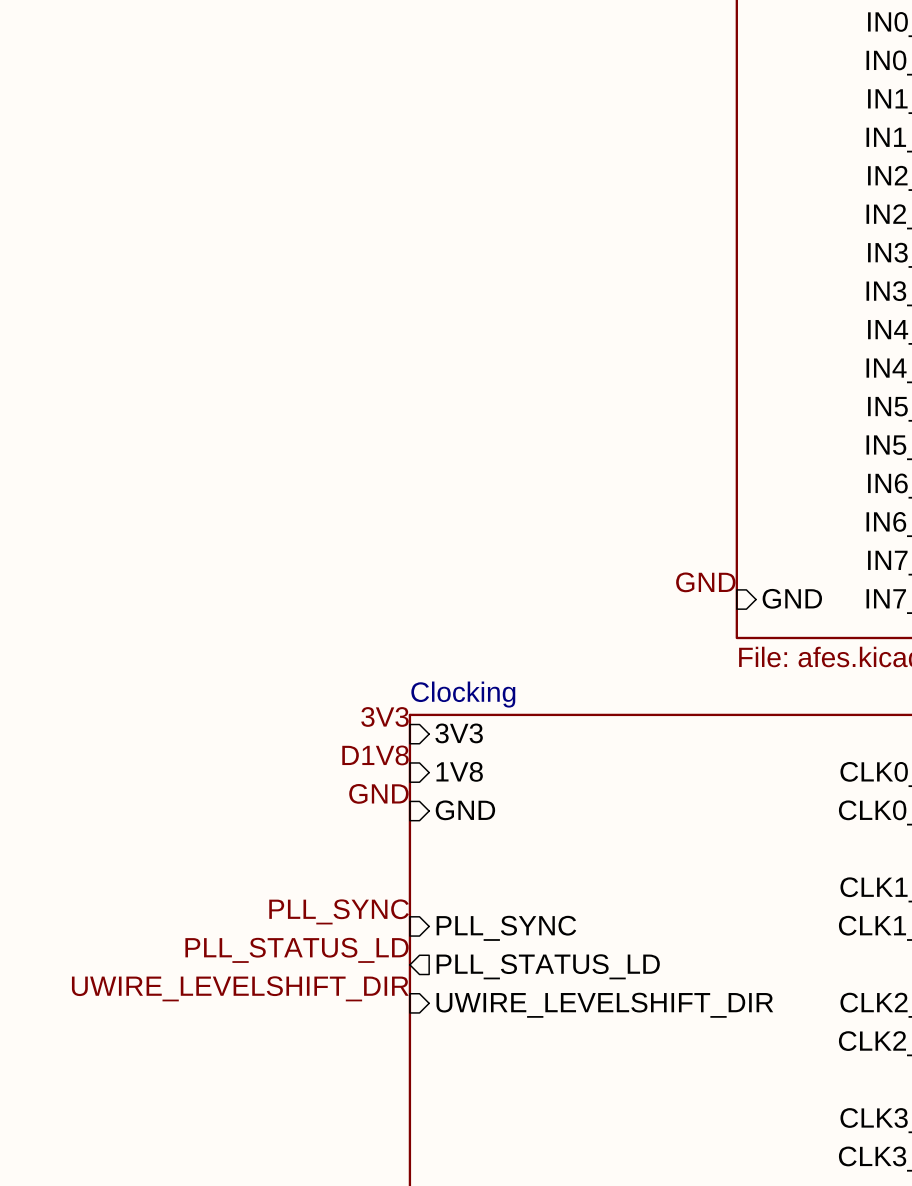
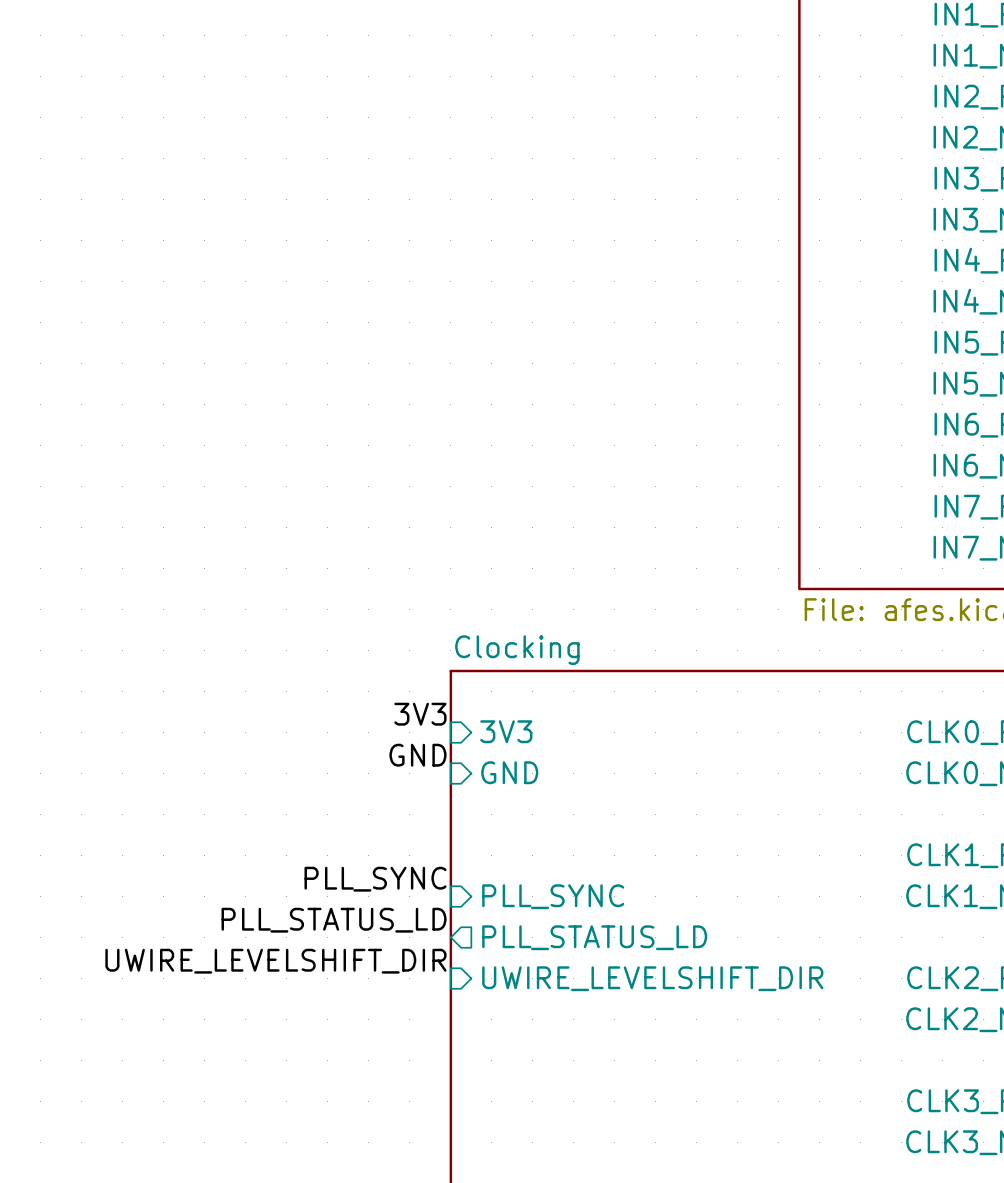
label: GND (705, 582) -> none
sheet pin: GND (792, 598) -> none
label: 3V3 (384, 716) -> none
sheet pin: 3V3 (459, 733) -> none
label: D1V8 (375, 755) -> 3V3 (420, 714)
sheet pin: 1V8 (459, 771) -> 3V3 (506, 731)

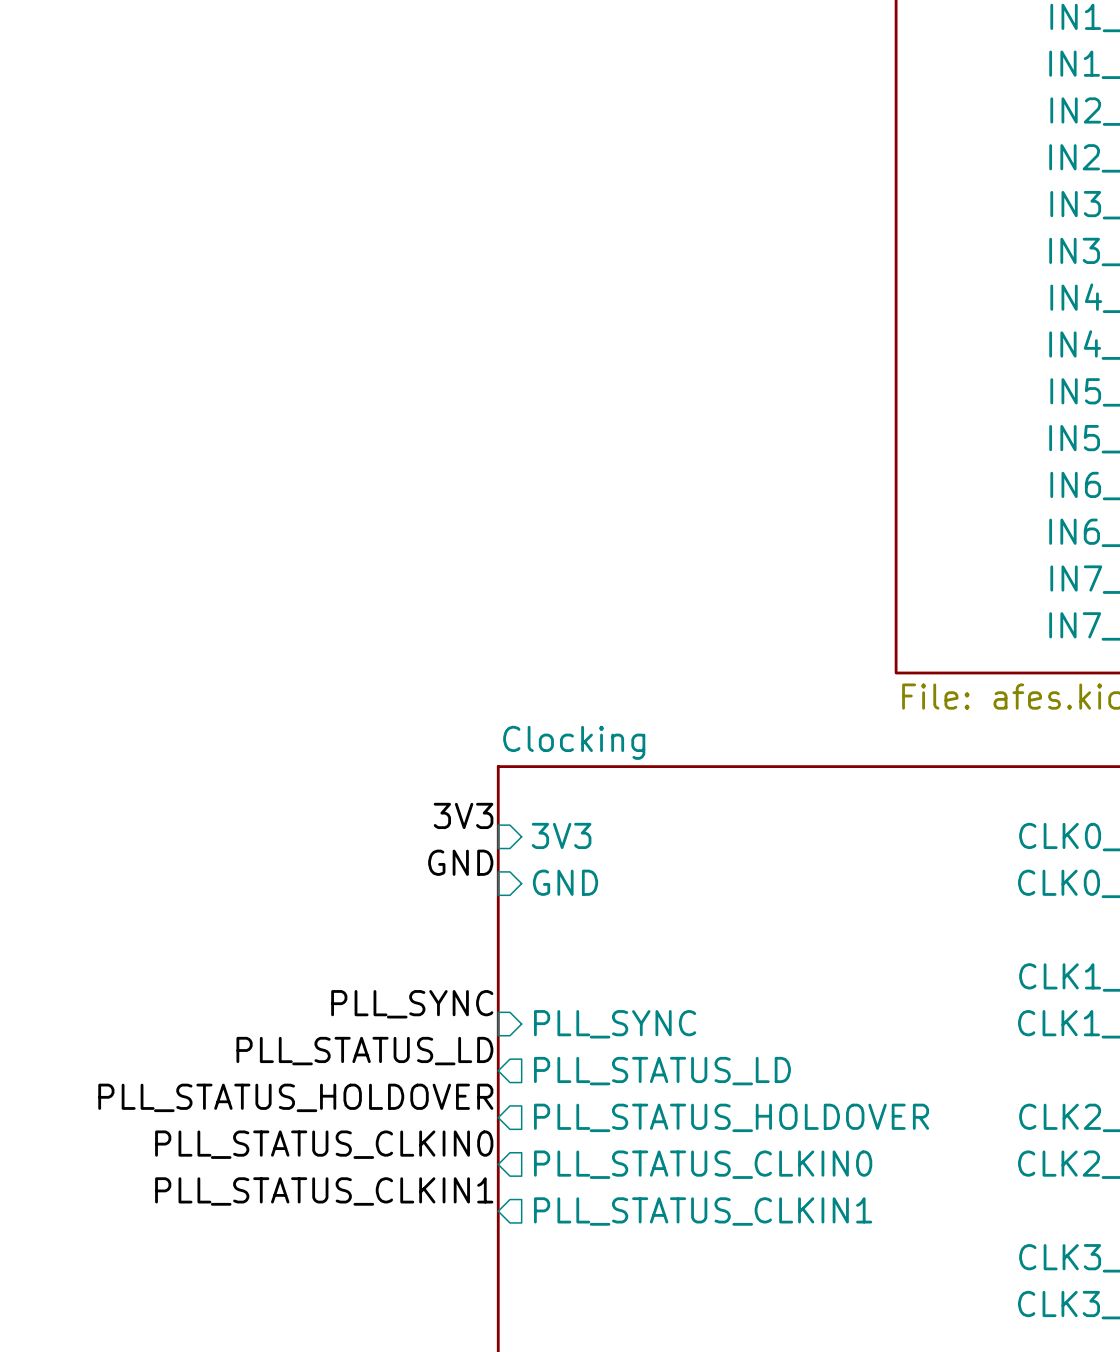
label: UWIRE_LEVELSHIFT_DIR (275, 961) -> PLL_STATUS_HOLDOVER (295, 1097)
sheet pin shape: input (652, 978) -> output (731, 1117)
sheet pin: UWIRE_LEVELSHIFT_DIR (652, 978) -> PLL_STATUS_HOLDOVER (731, 1117)
label: none -> PLL_STATUS_CLKIN0 (324, 1144)
sheet pin: none -> PLL_STATUS_CLKIN0 (703, 1164)
label: none -> PLL_STATUS_CLKIN1 (324, 1191)
sheet pin: none -> PLL_STATUS_CLKIN1 (703, 1211)

